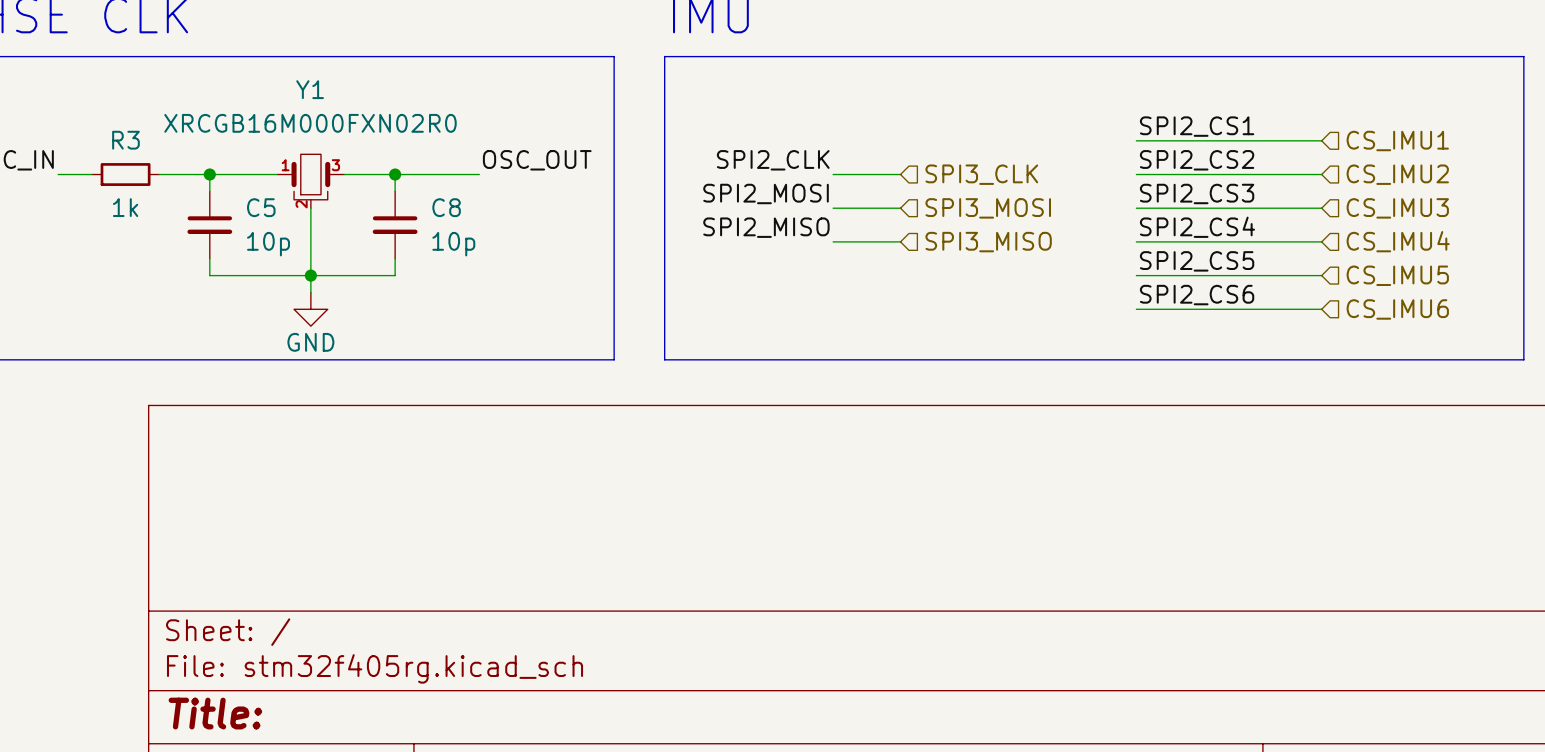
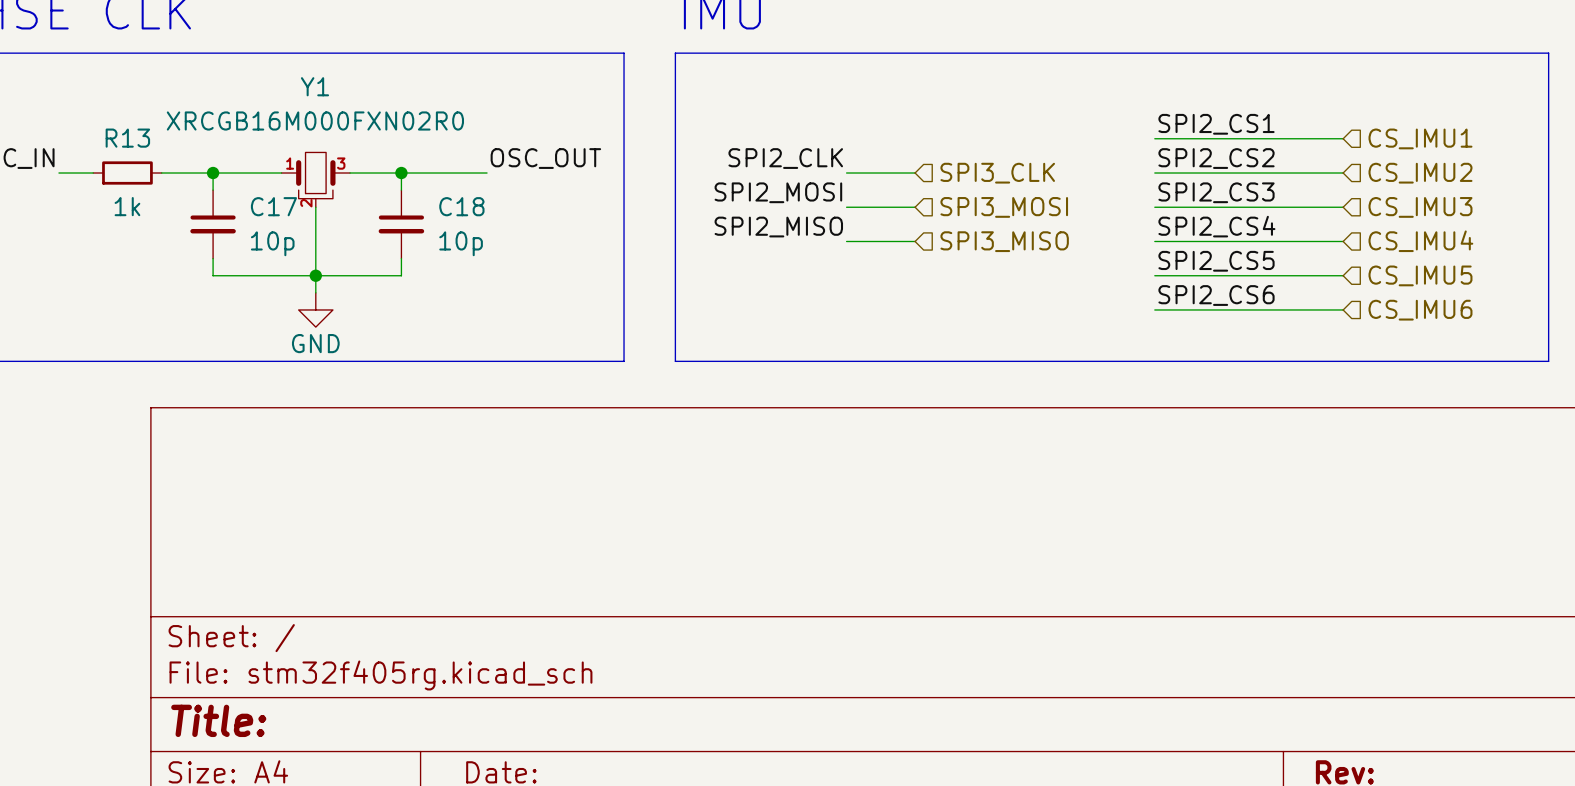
R3 name: R3 (125, 140) -> R13 (127, 138)
C5 name: C5 (261, 207) -> C17 (273, 206)
C8 name: C8 (446, 207) -> C18 (461, 206)

